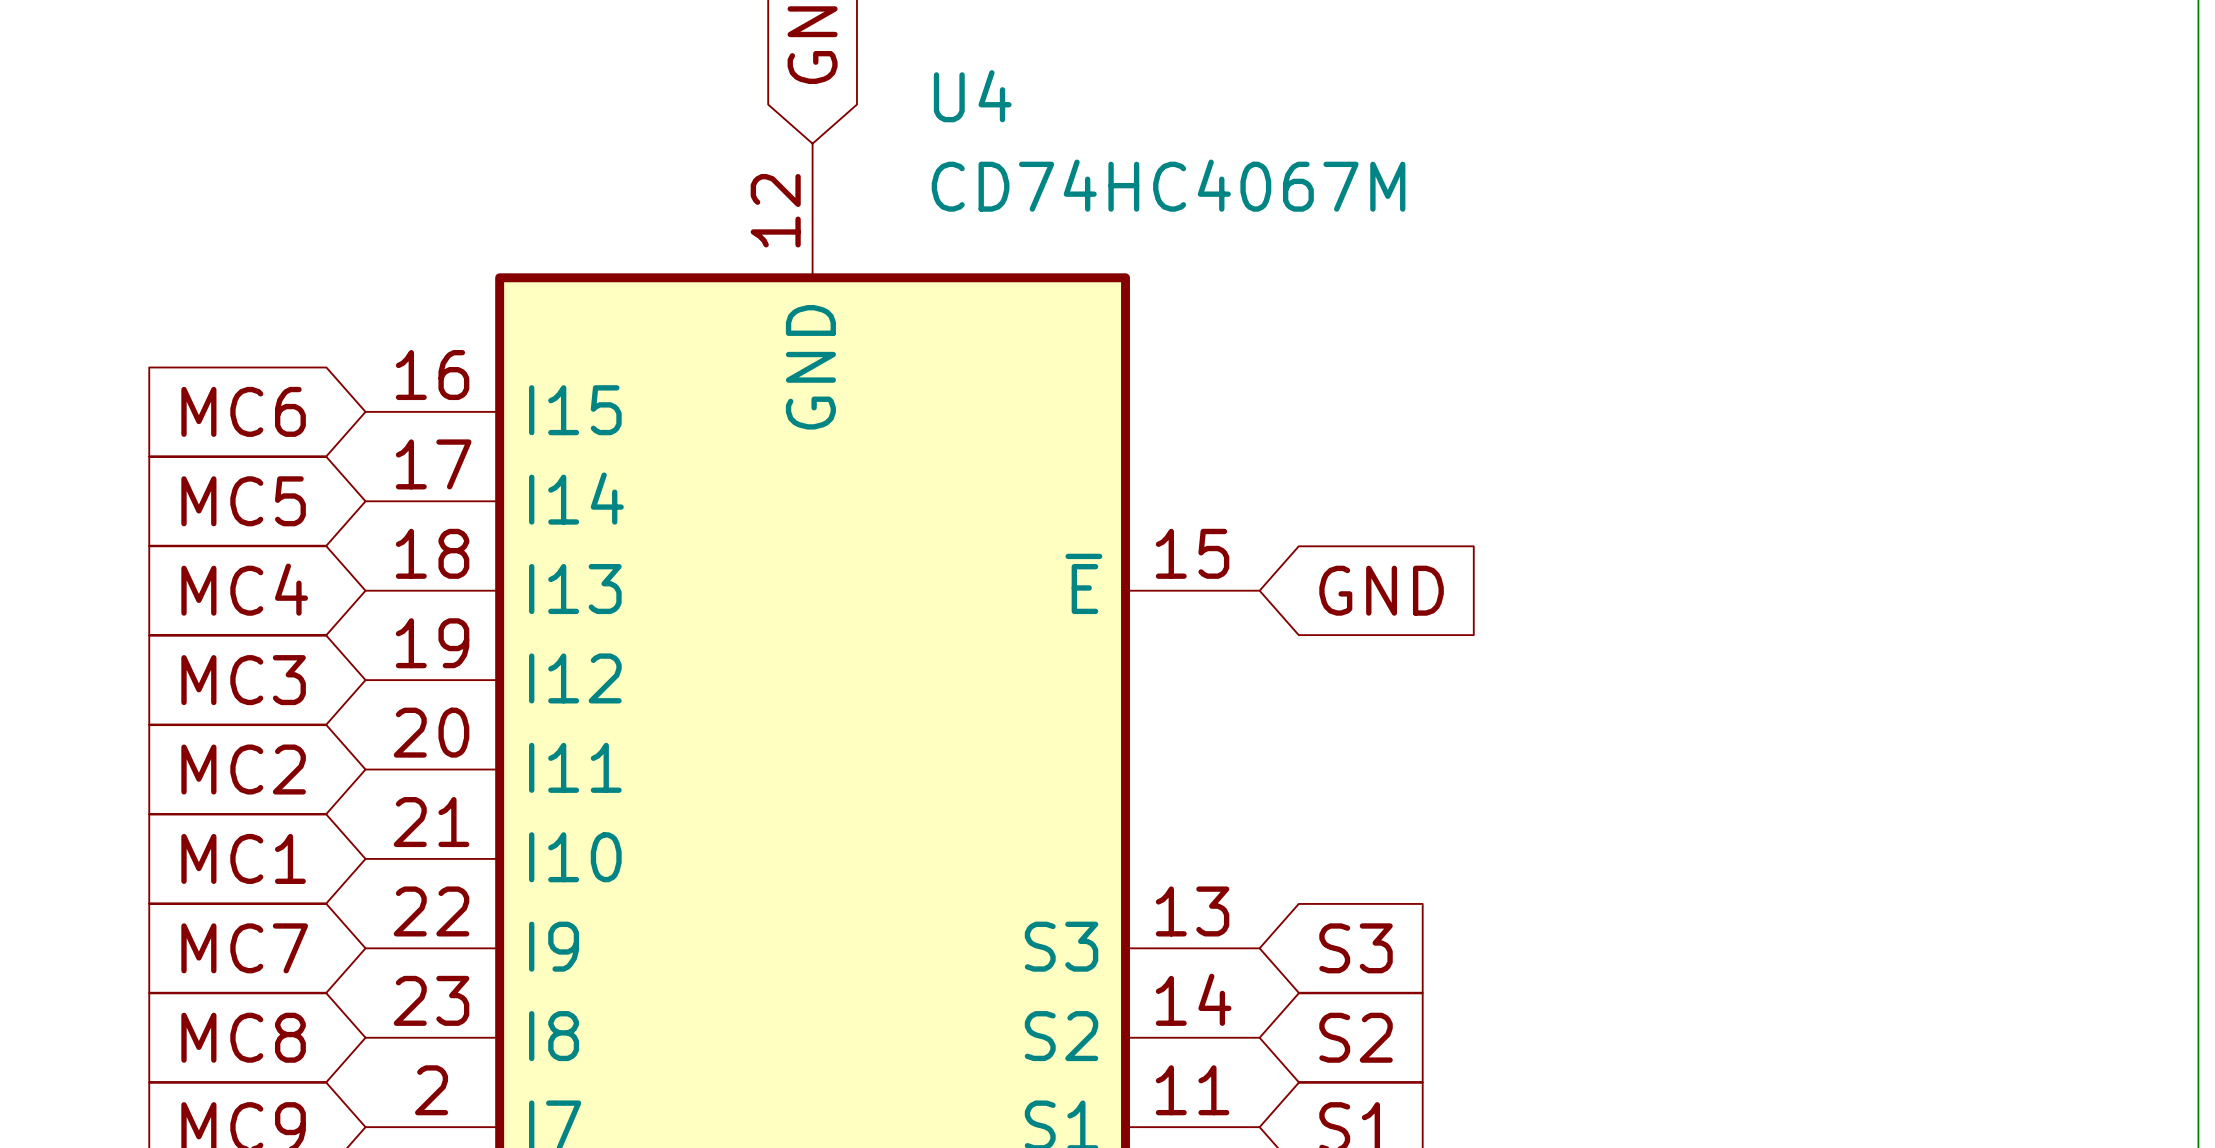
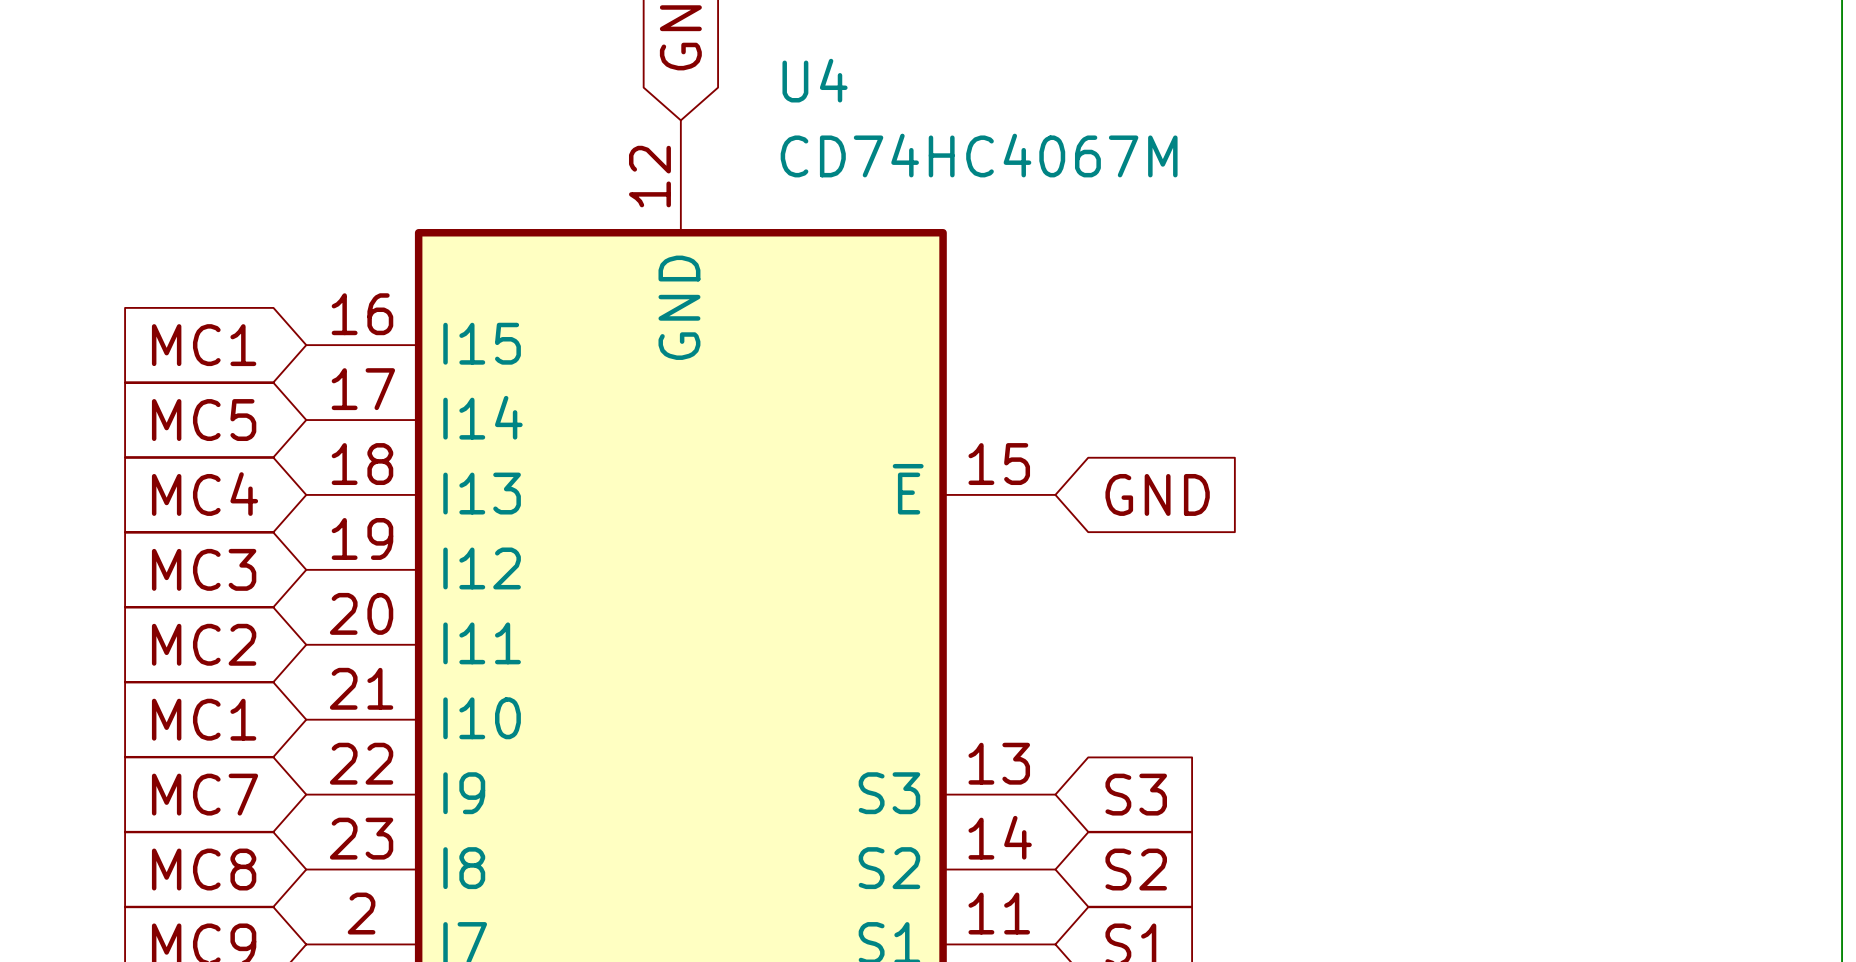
global label: MC6 (243, 411) -> MC1 (204, 345)

